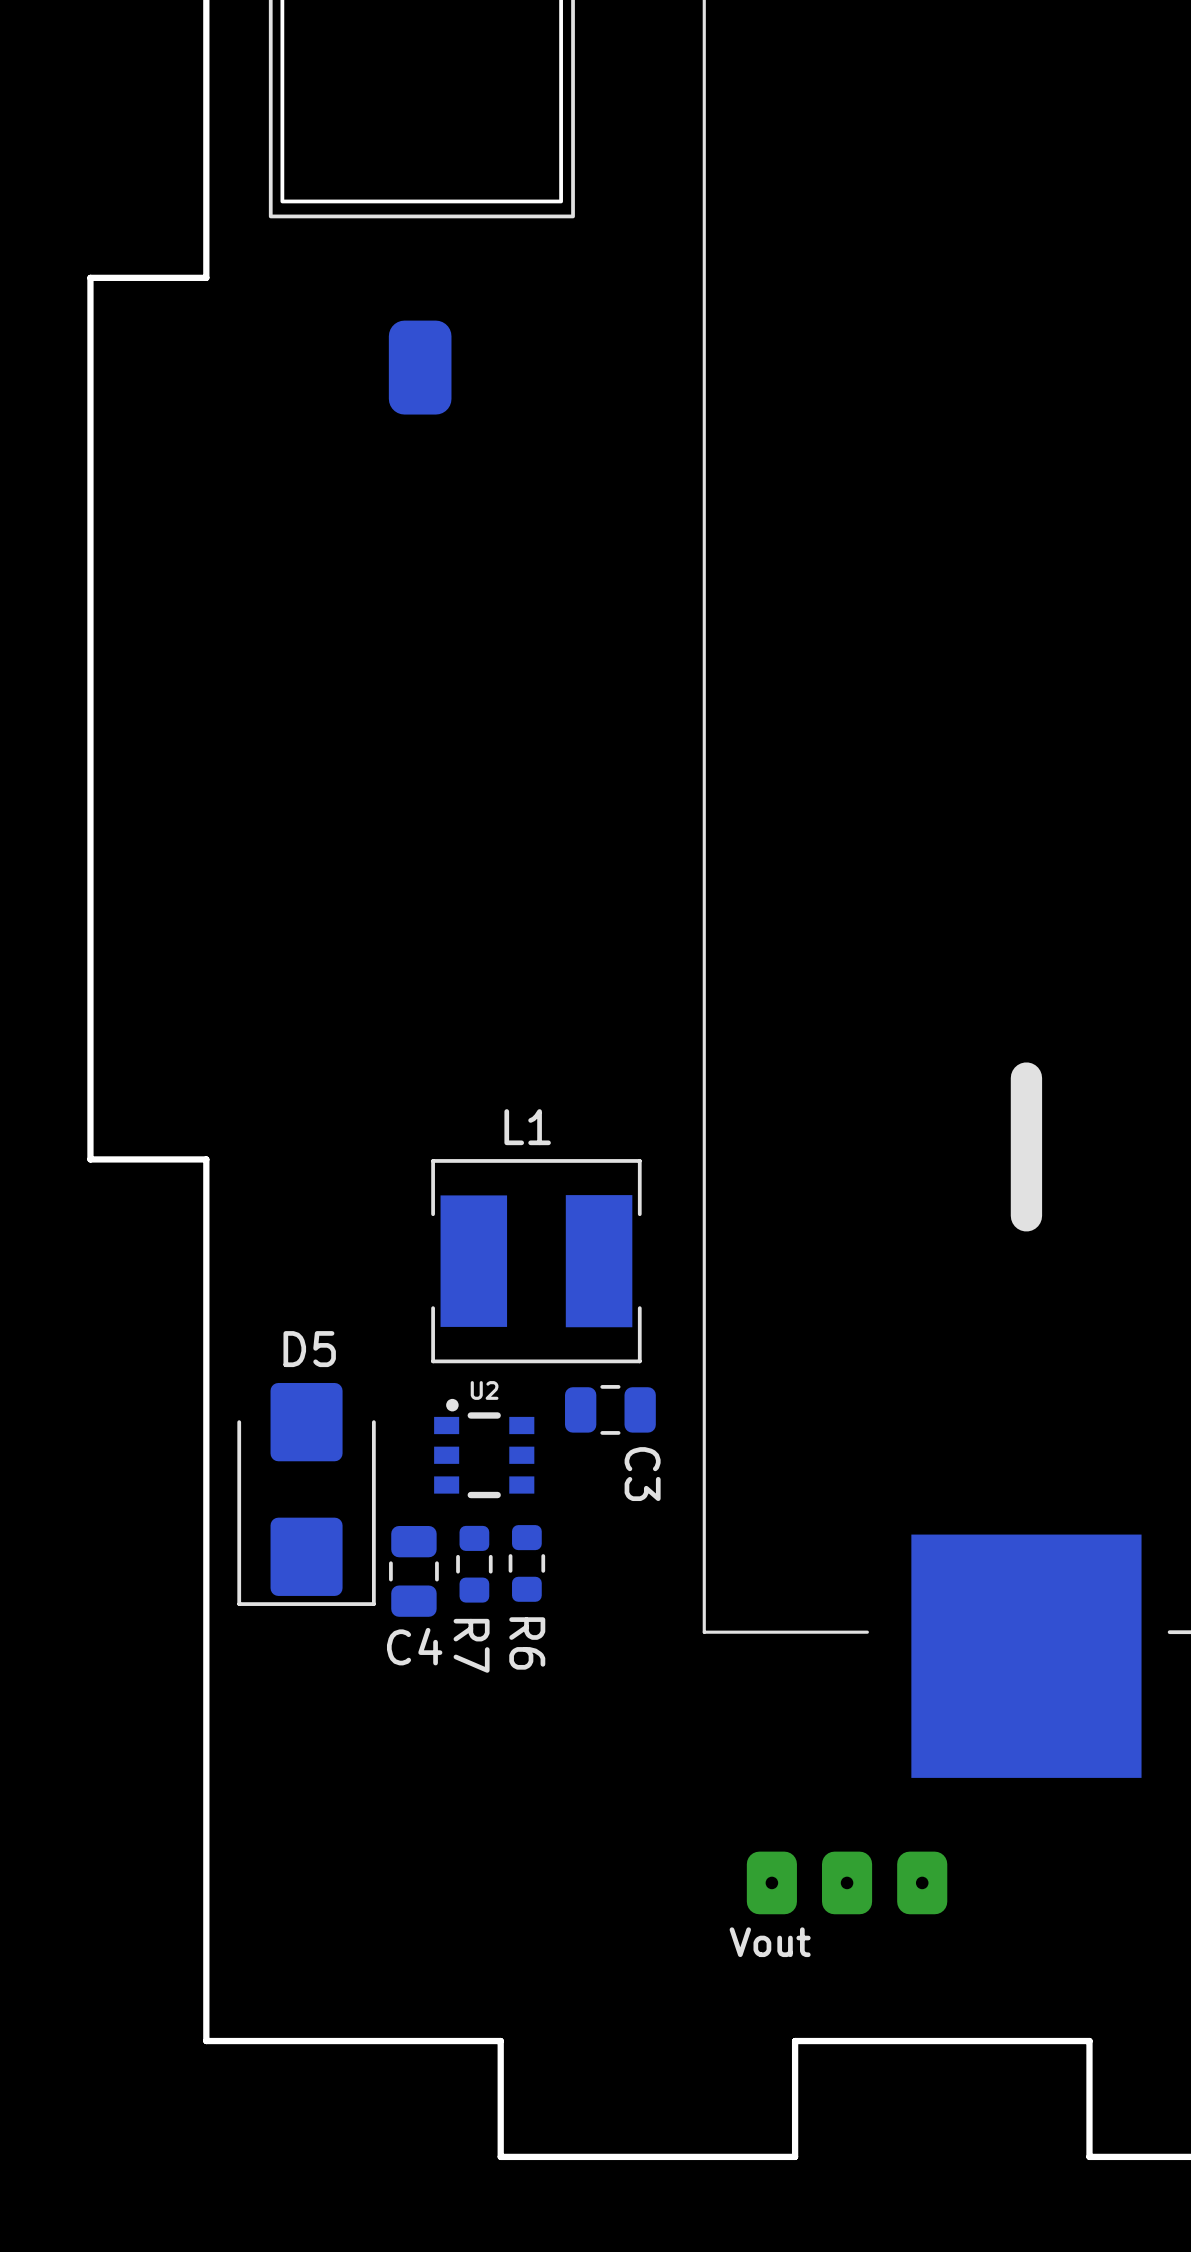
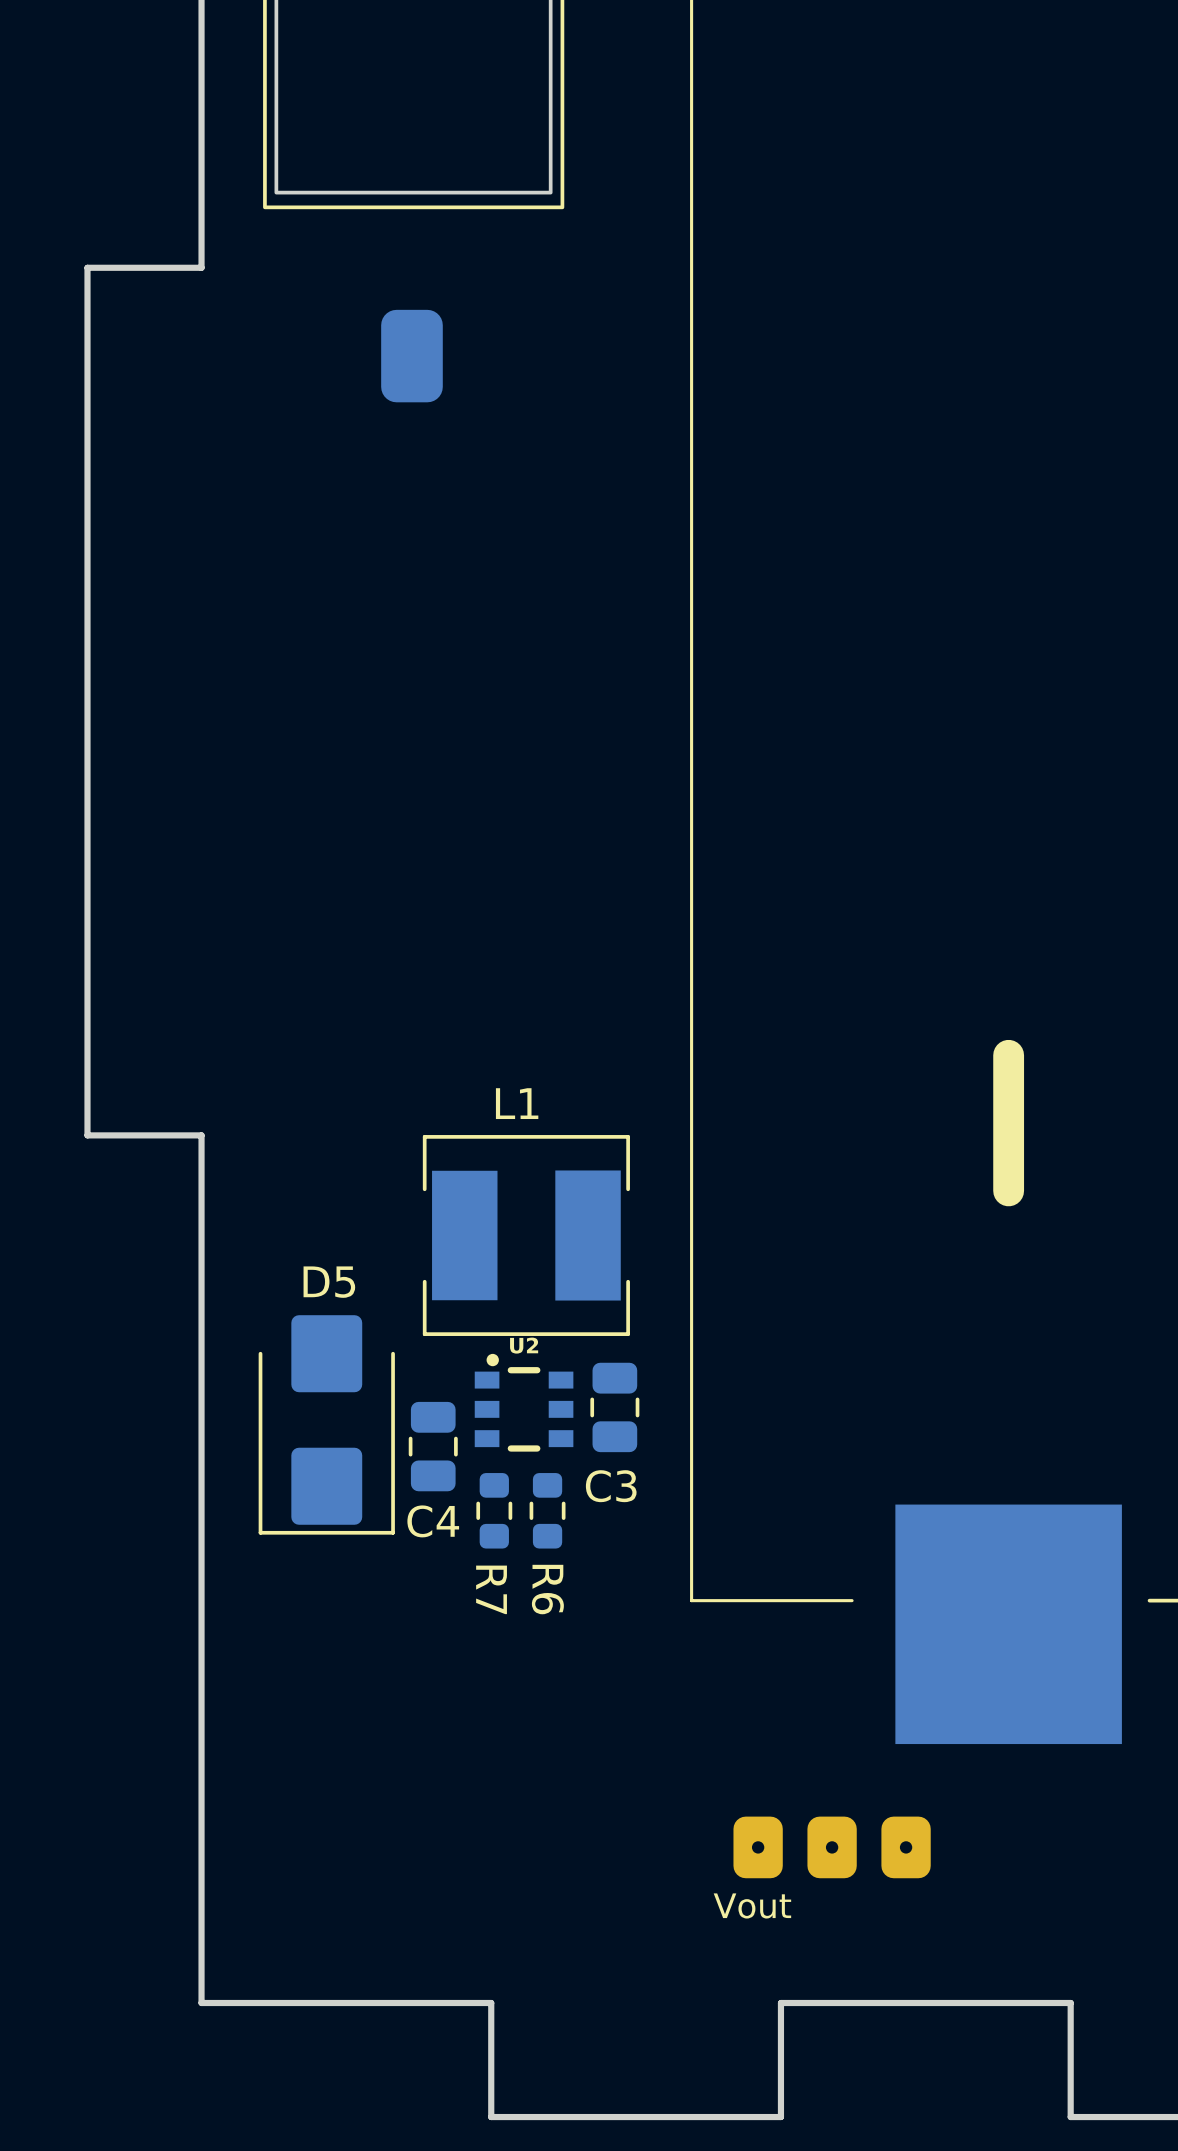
C3 rotation: 0° (610, 1409) -> 90° clockwise (614, 1407)
U2 position: (484, 1448) -> (524, 1402)
D5 position: (306, 1494) -> (326, 1424)
R6 position: (526, 1563) -> (547, 1510)
R7 position: (474, 1564) -> (494, 1510)
C4 position: (413, 1571) -> (433, 1446)

